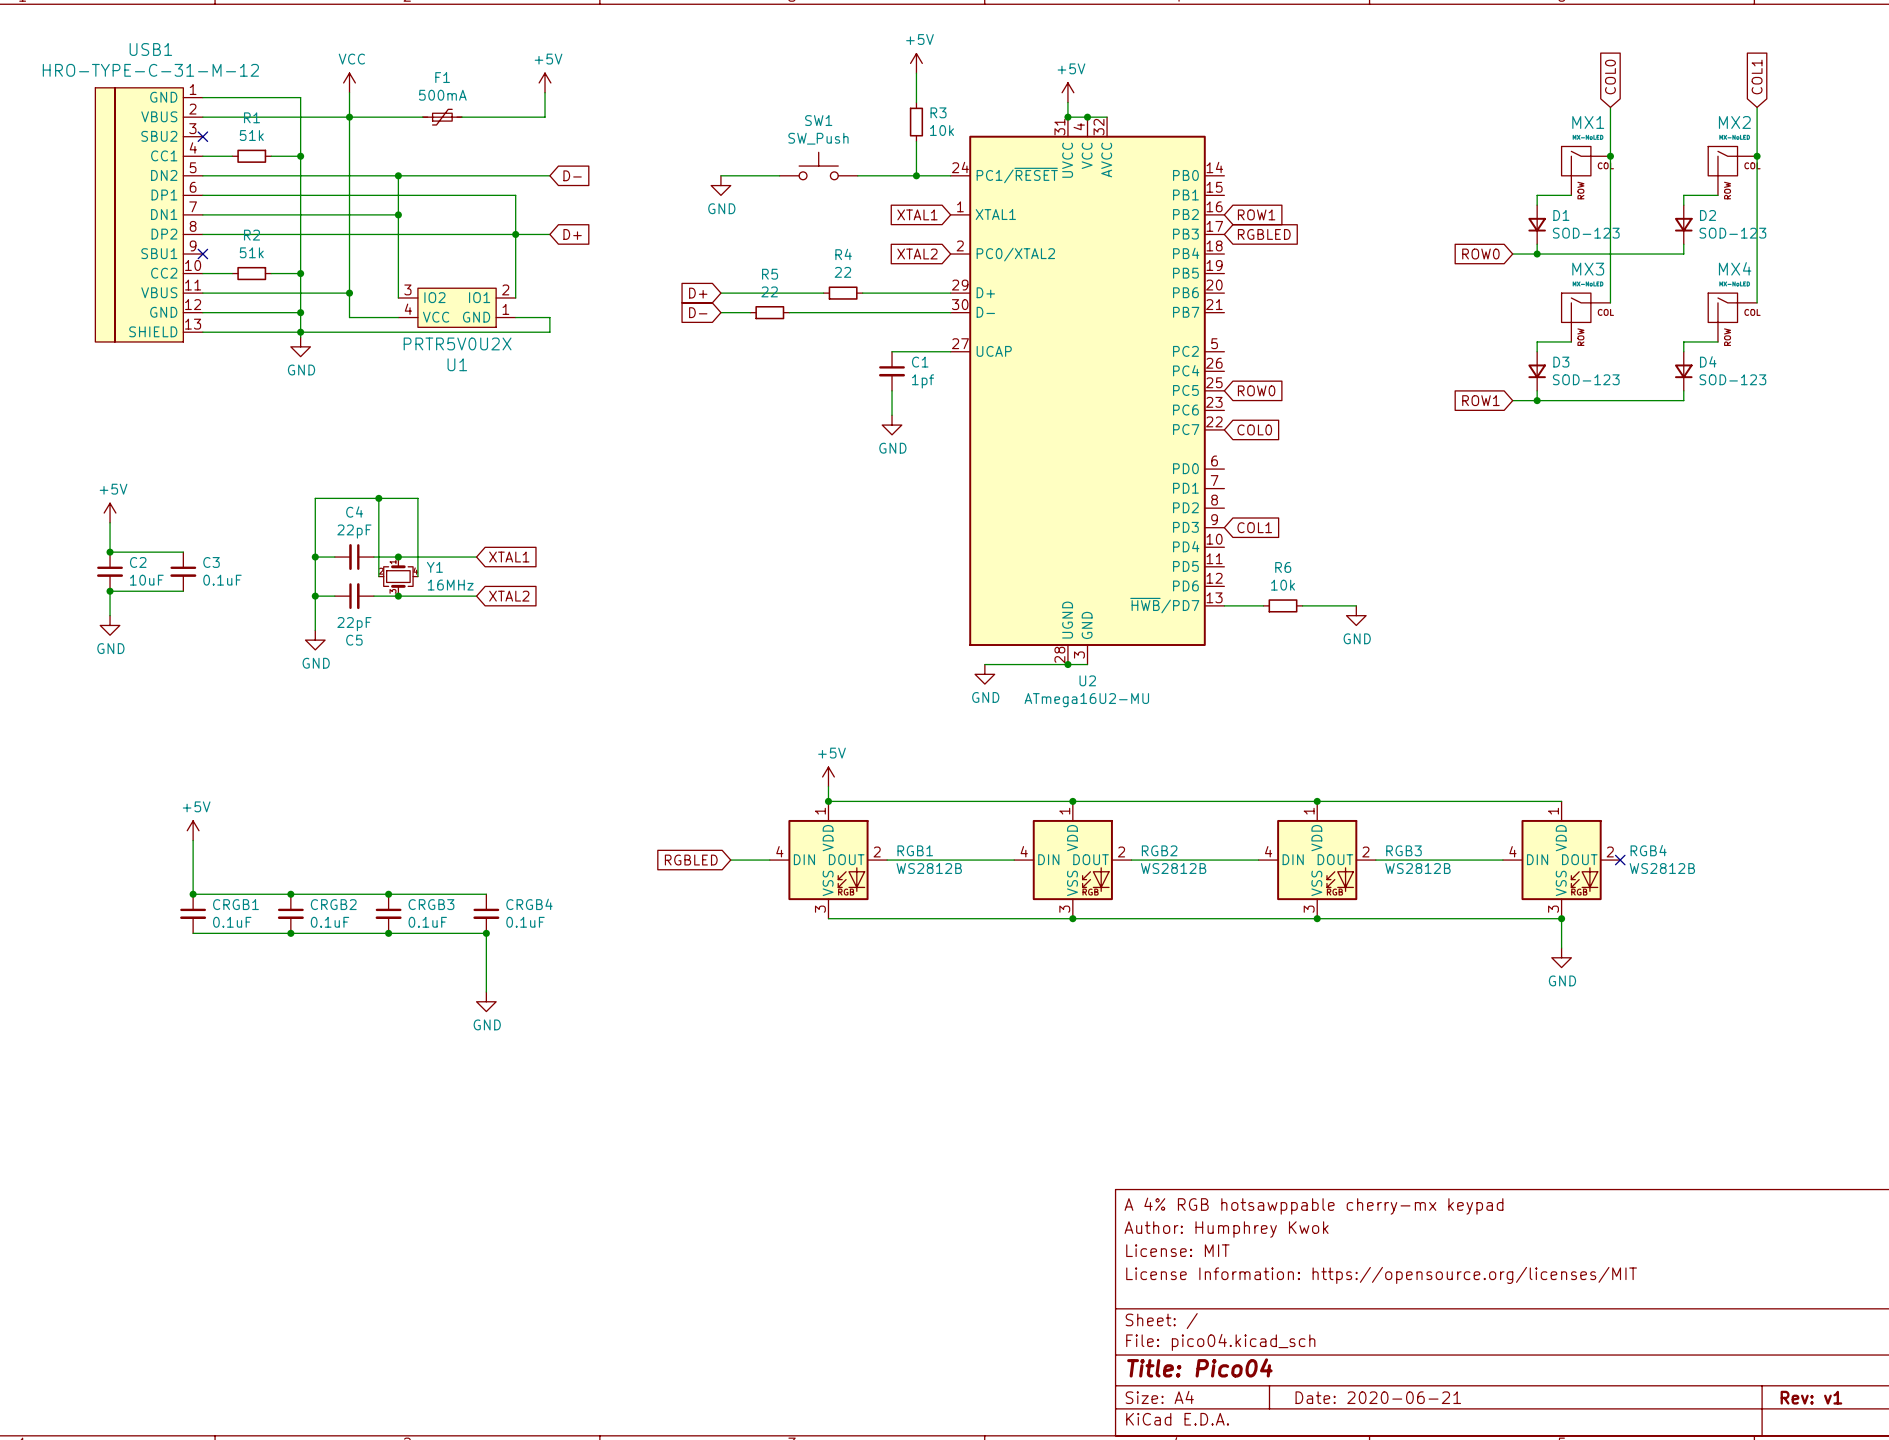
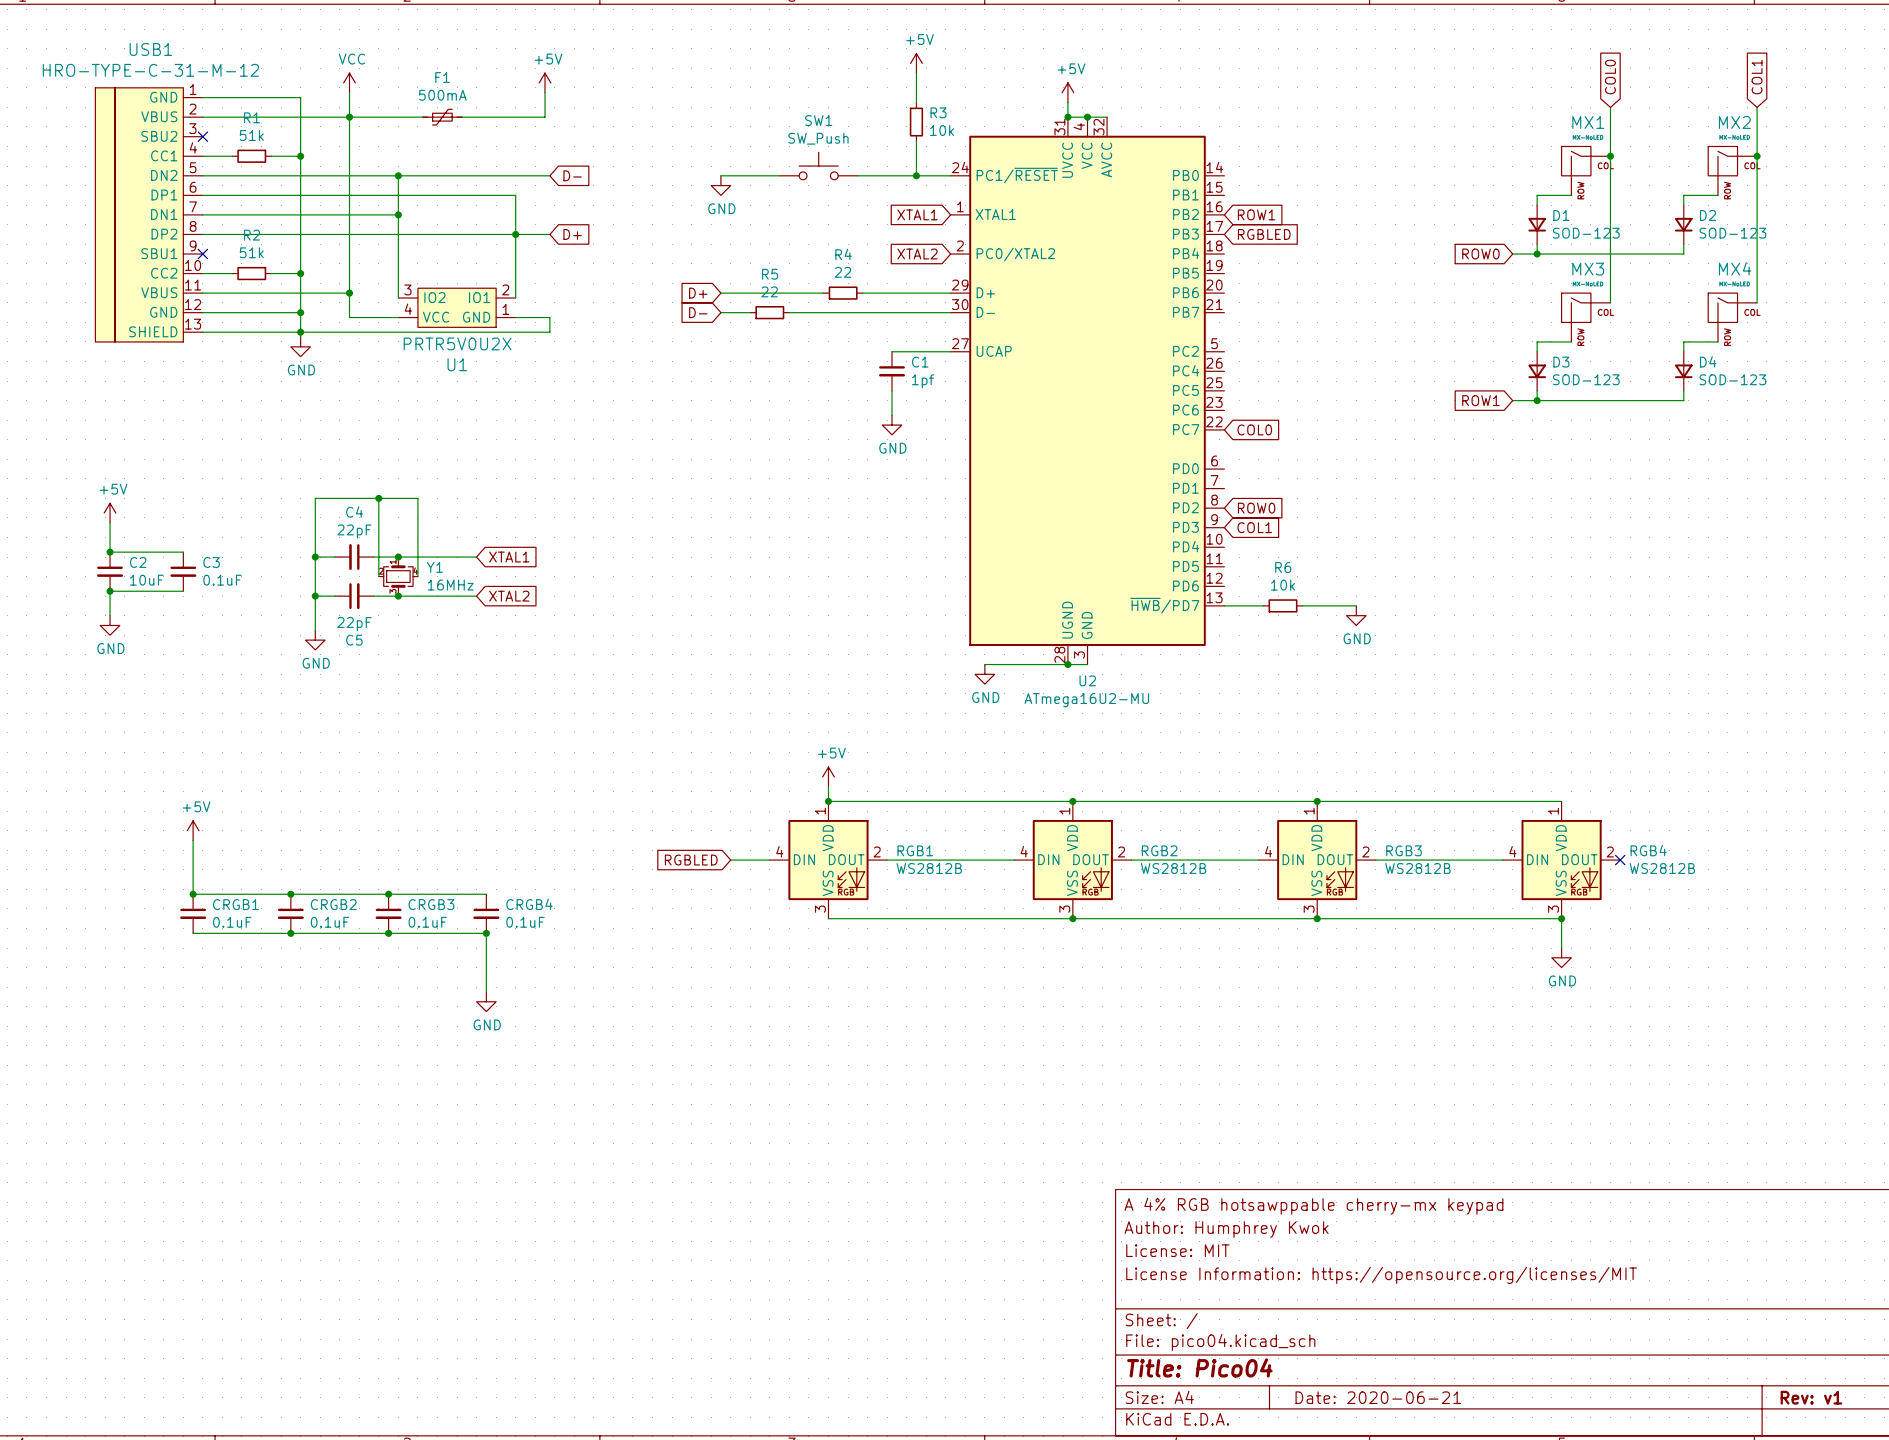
global label position: ROW0 (1256, 390) -> ROW0 (1256, 508)

